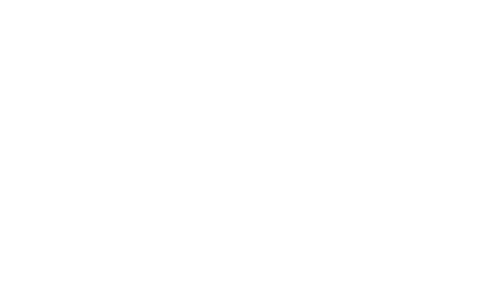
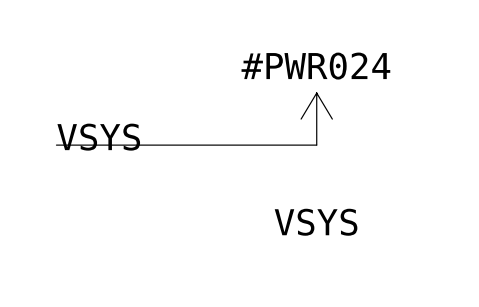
#PWR024: none -> VSYS (316, 119)
label: none -> VSYS (98, 137)
wire: none -> (56, 145) (316, 145)

